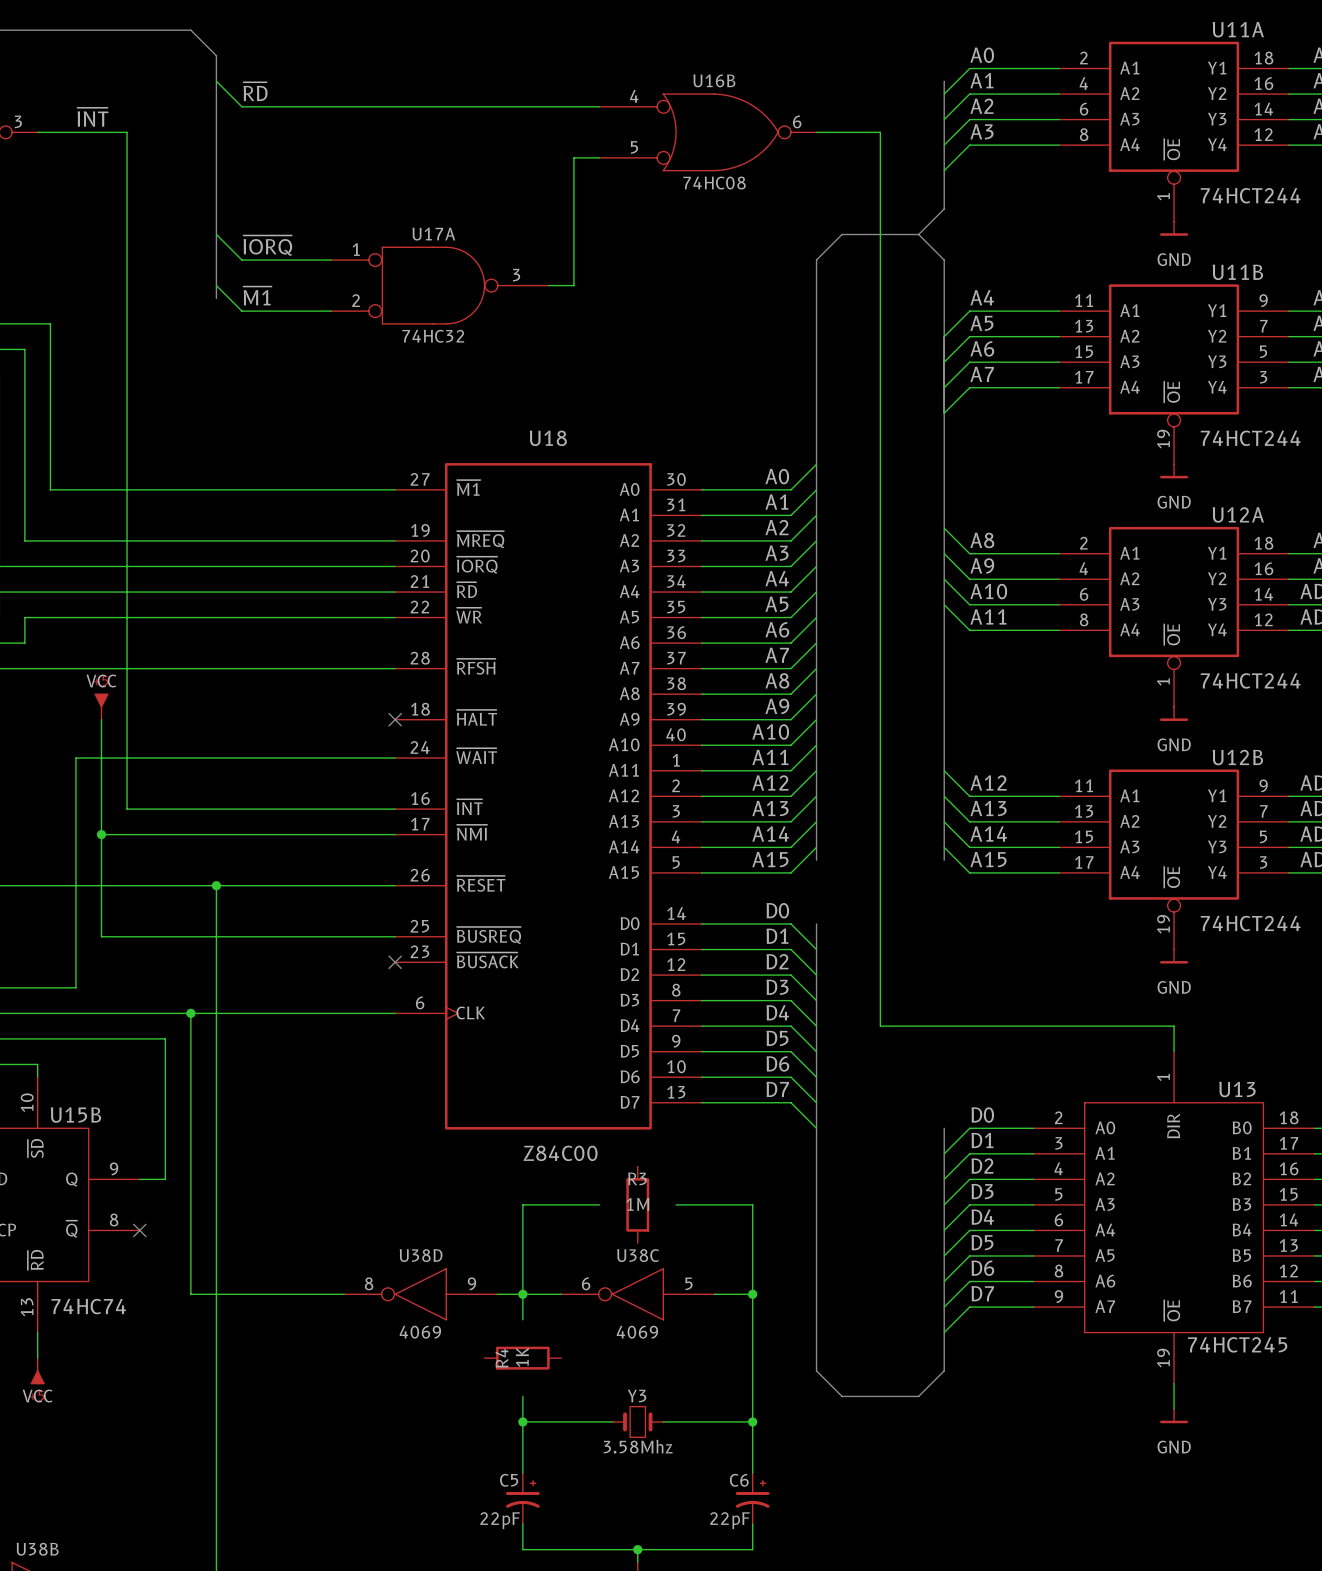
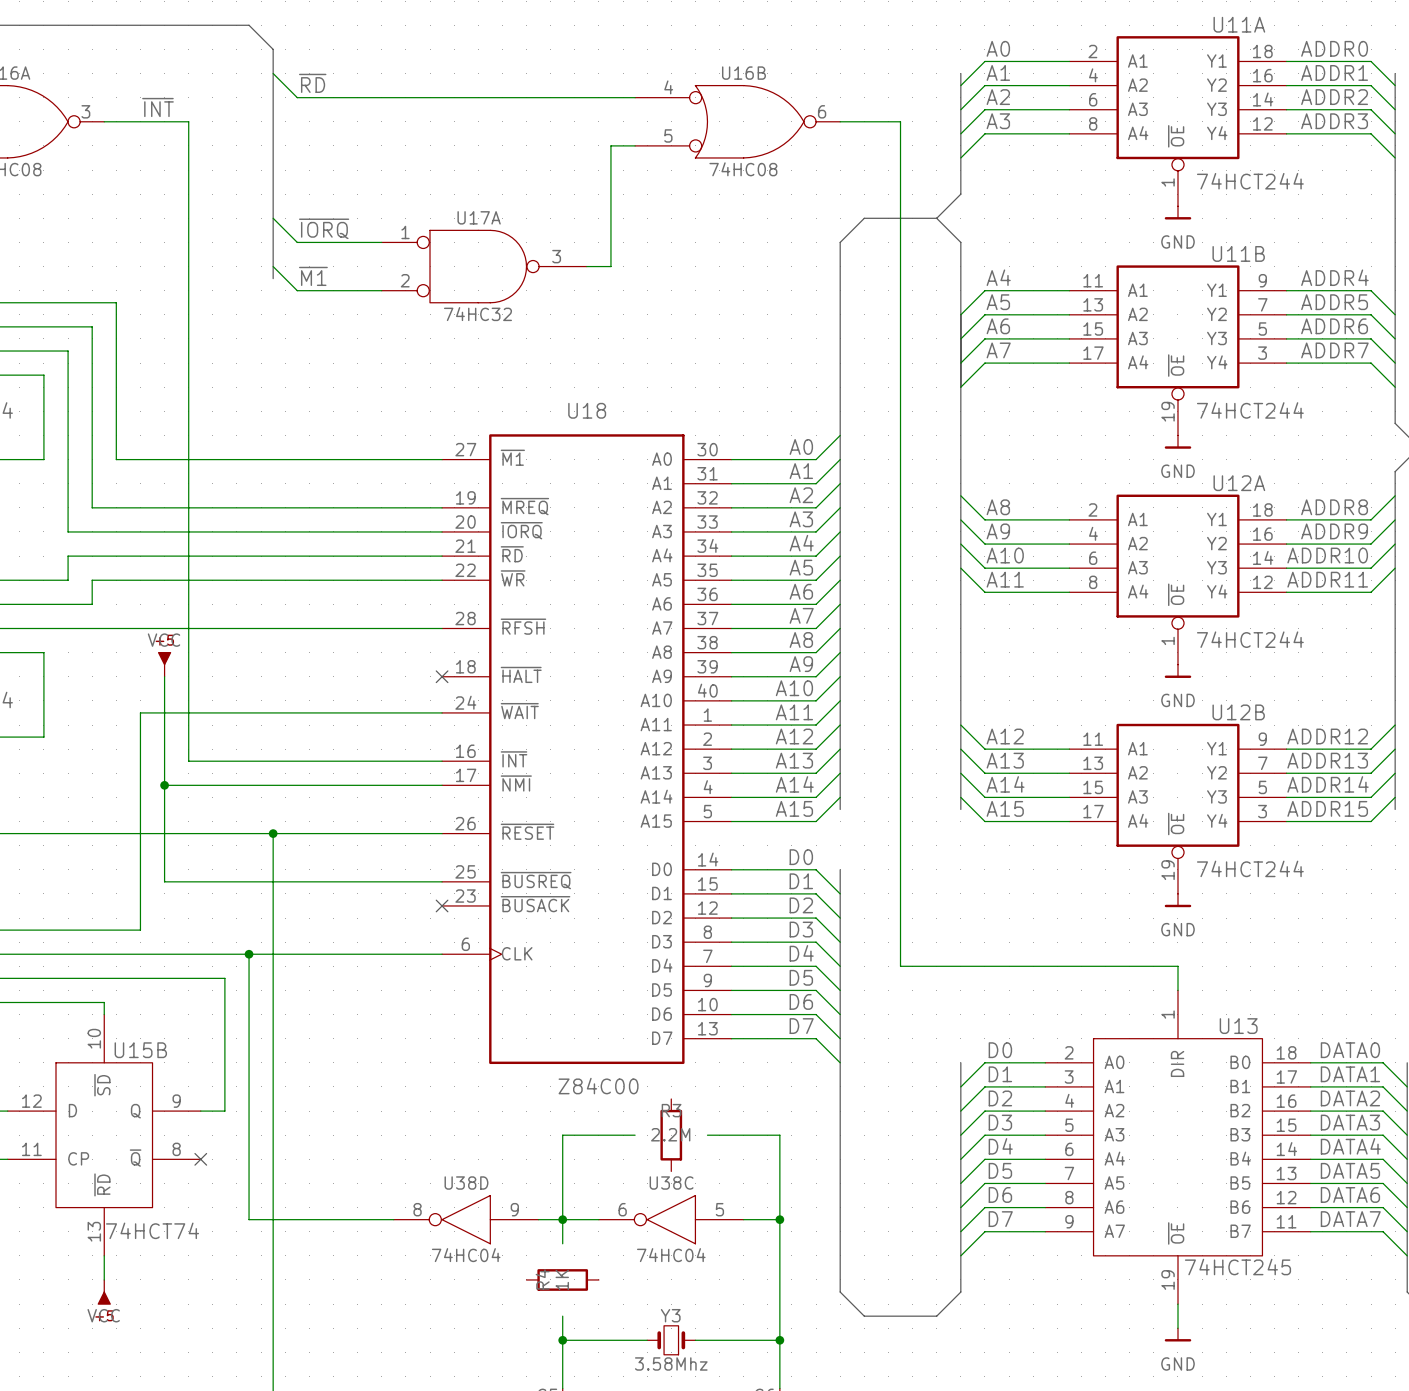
R3 value: 1M (637, 1204) -> 2.2M (670, 1134)
U15B value: 74HC74 (88, 1306) -> 74HCT74 (152, 1230)
U38D value: 4069 (420, 1332) -> 74HC04 (466, 1255)
U38C value: 4069 (637, 1332) -> 74HC04 (671, 1255)

